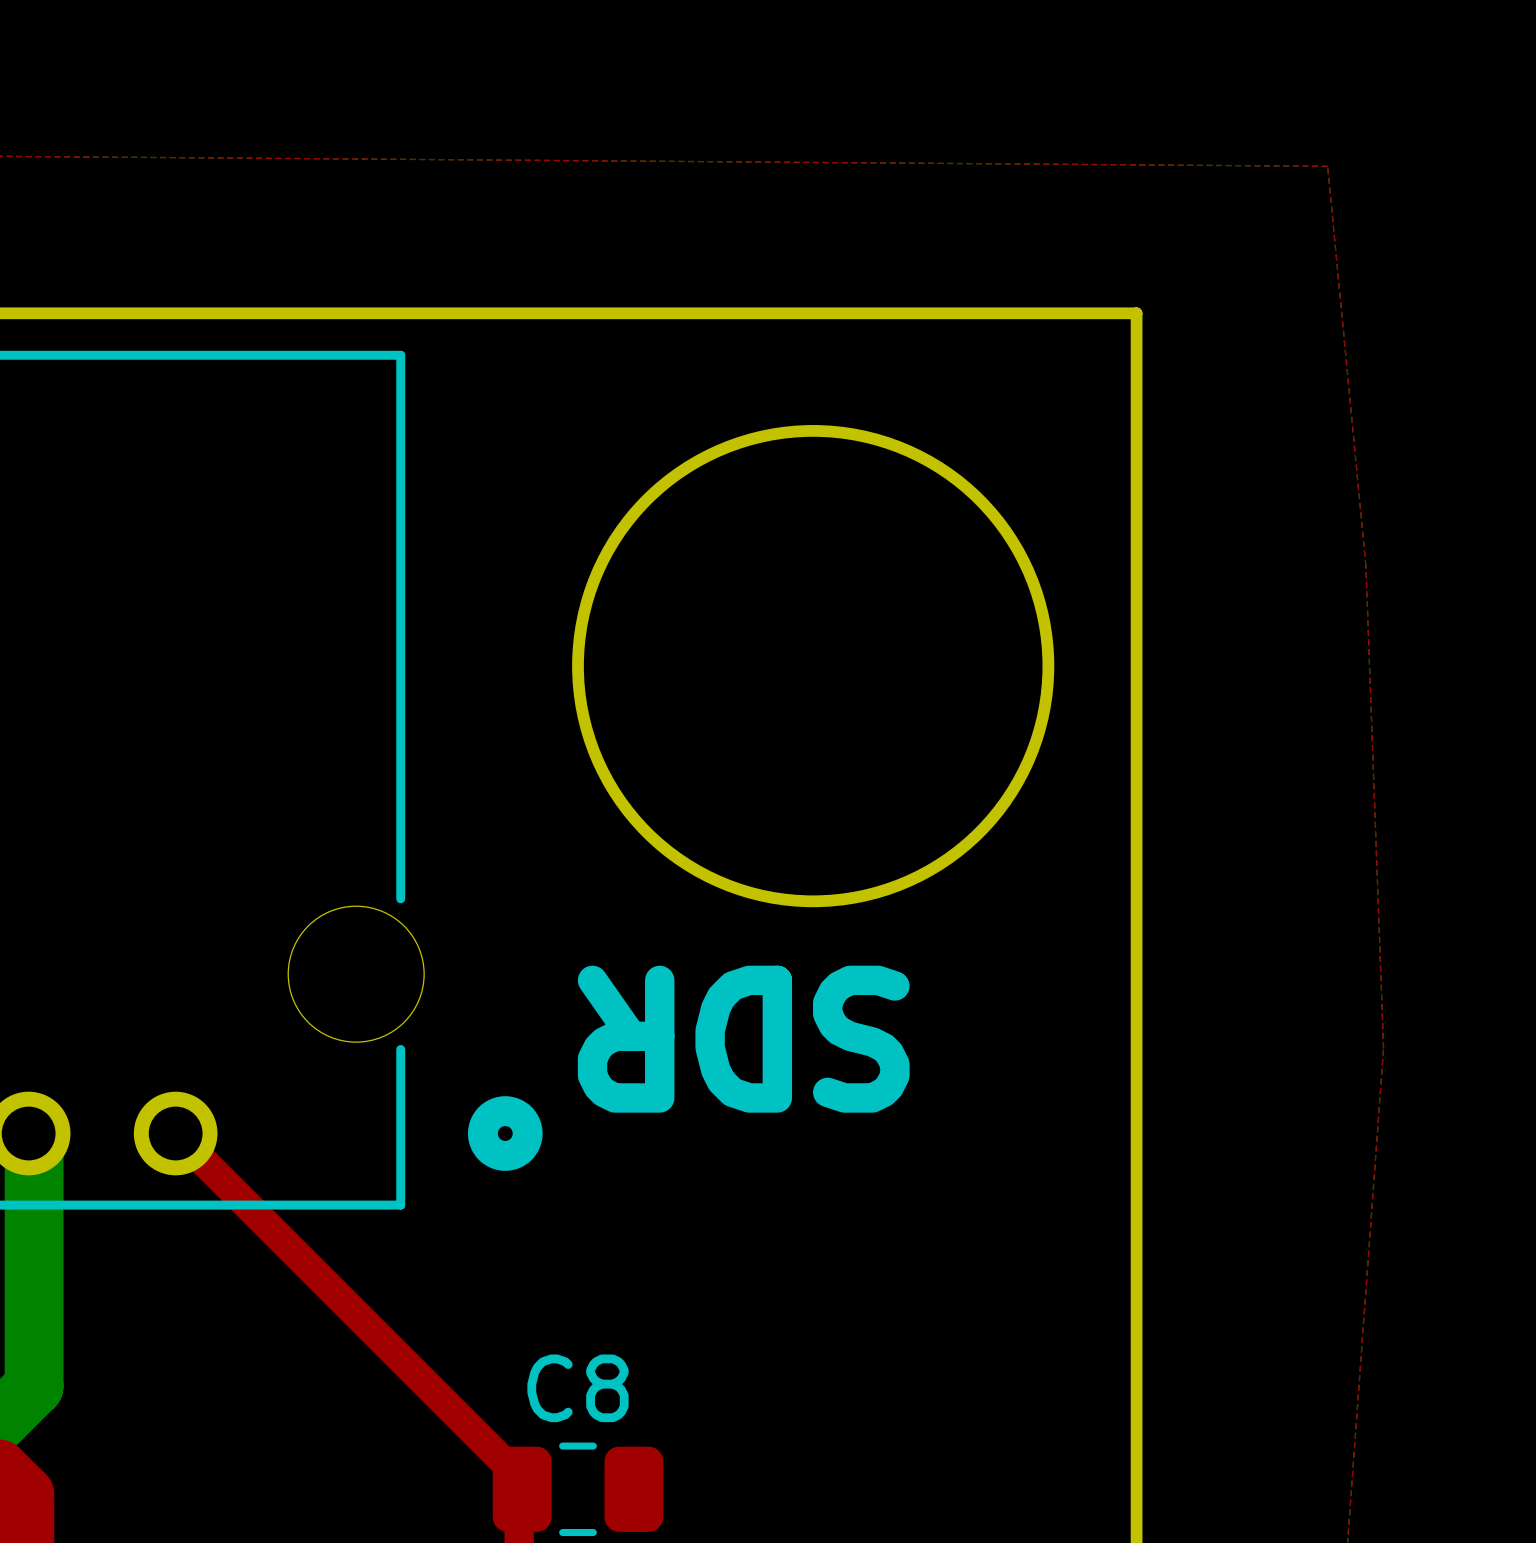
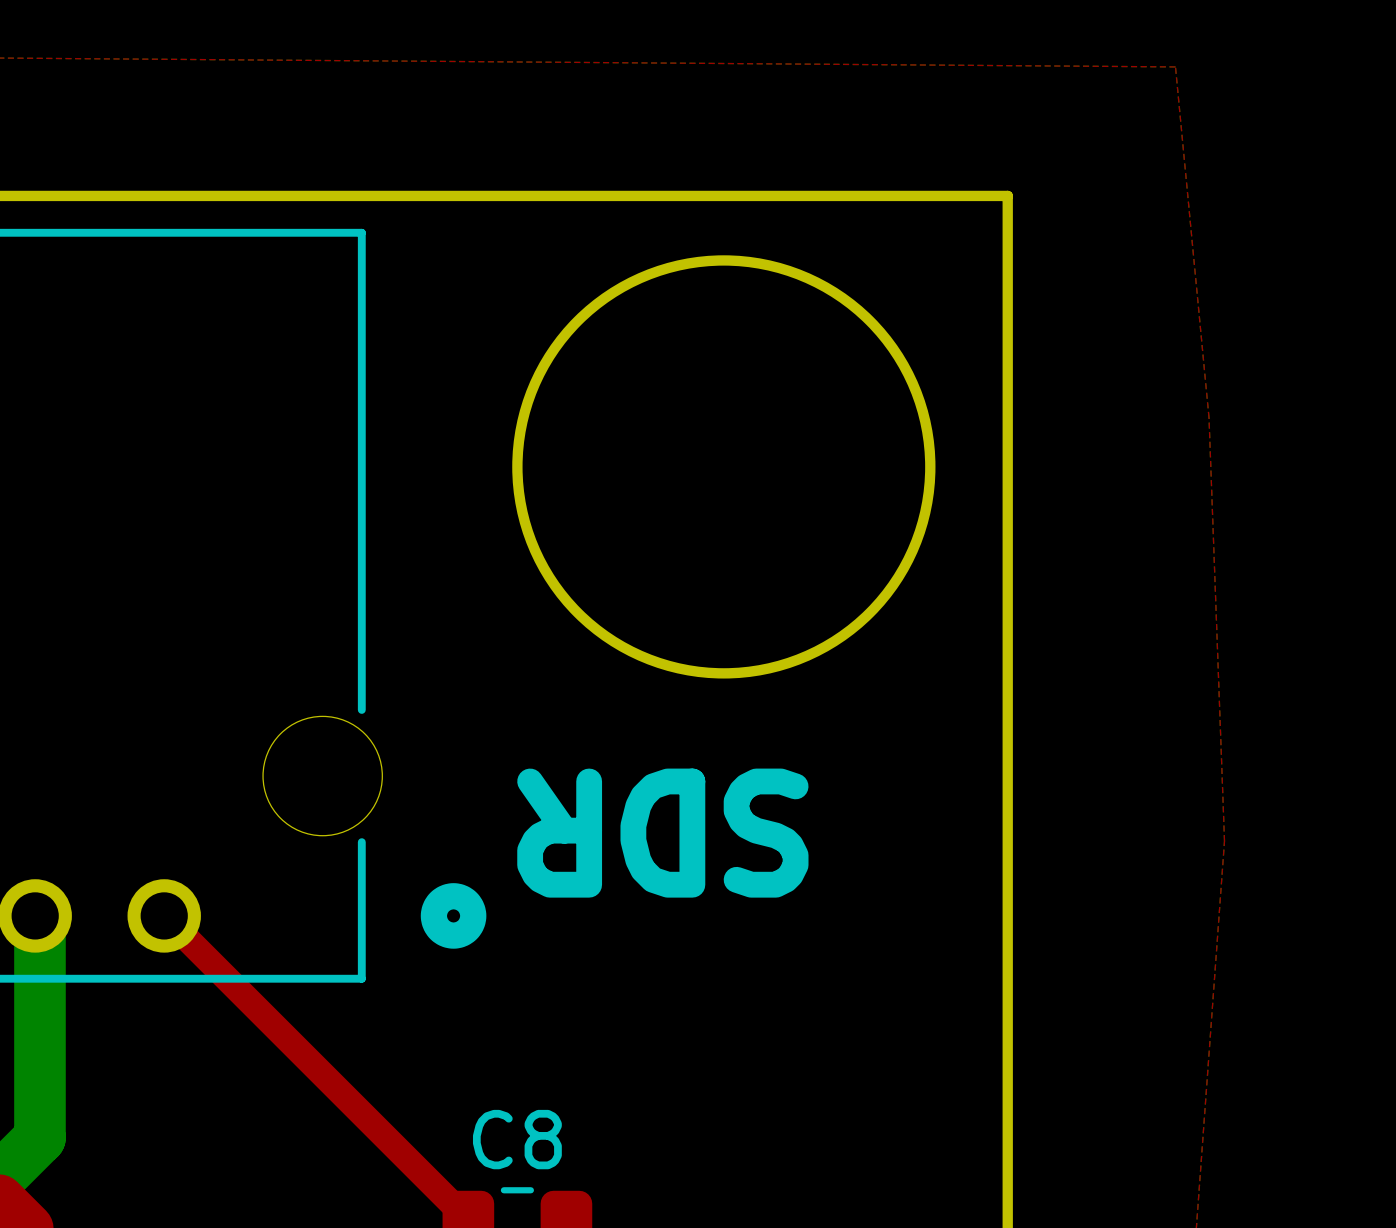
round board edge position: (813, 666) -> (723, 466)

